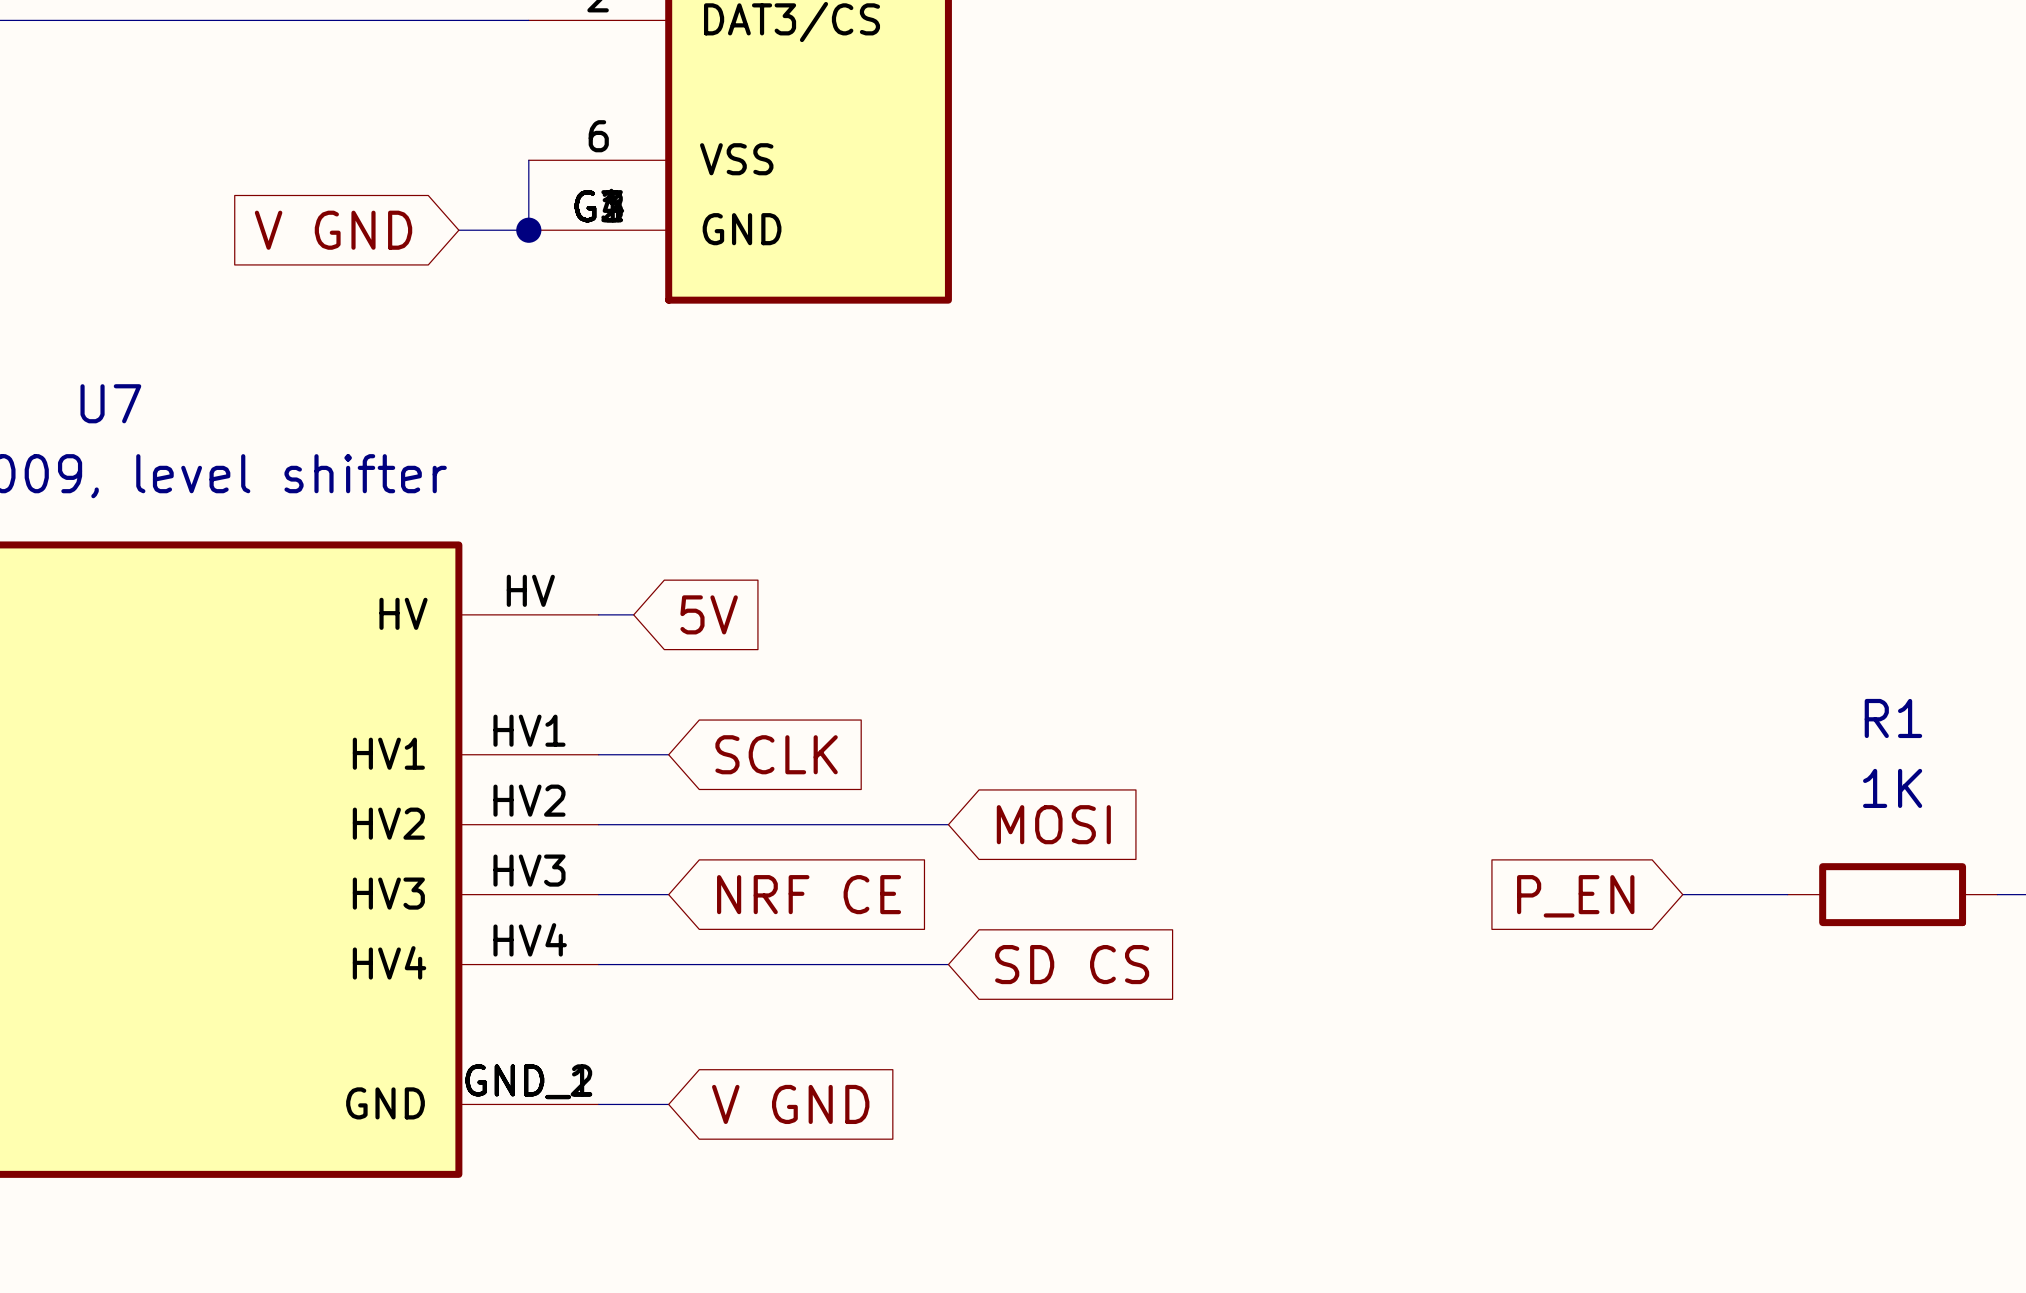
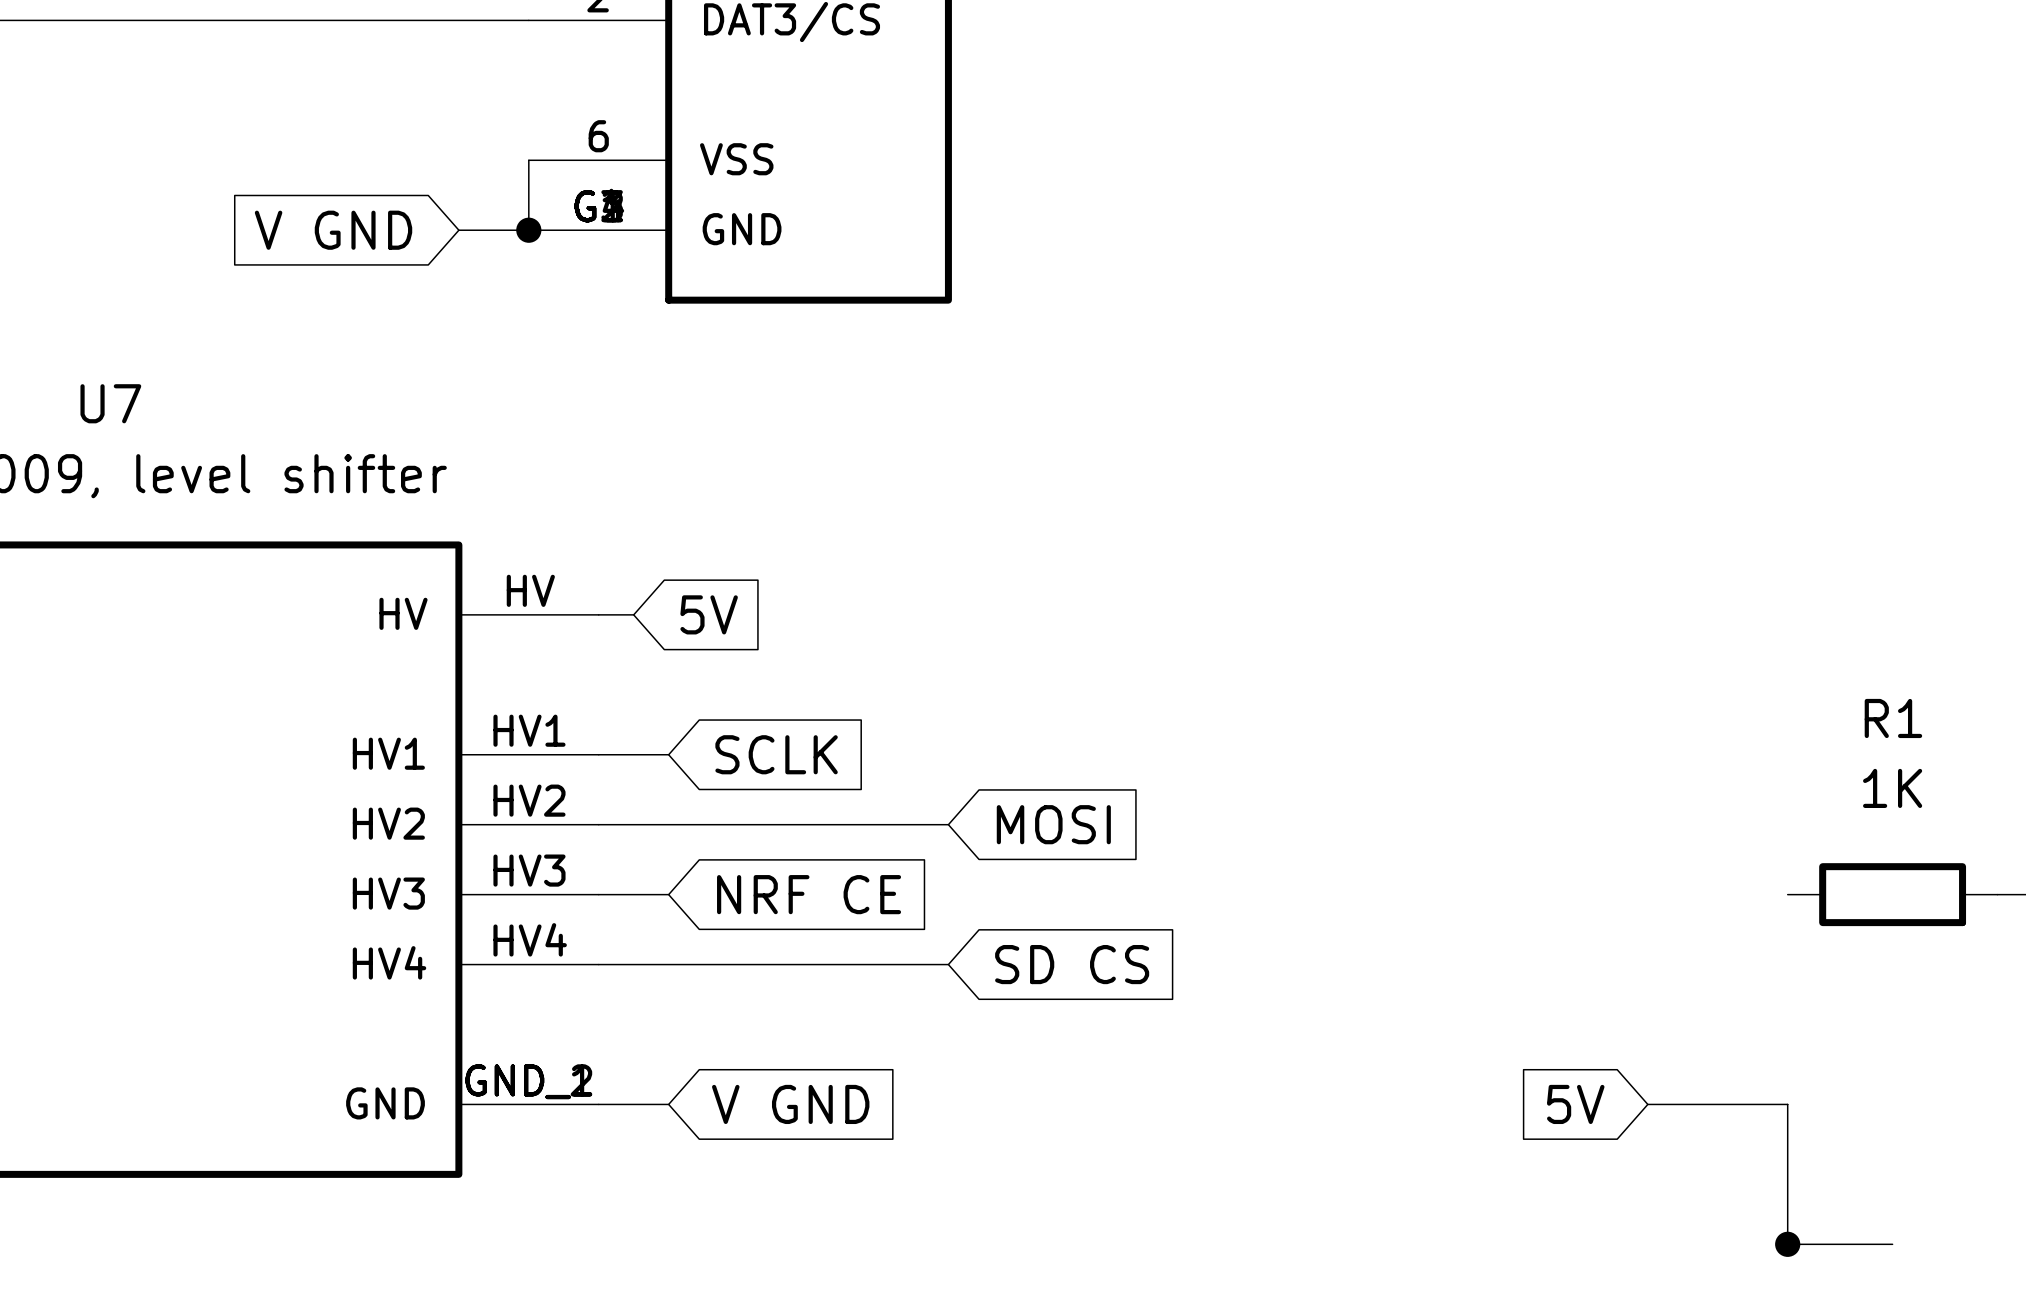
wire: (1682, 894) (1787, 894) -> none
global label: P_EN (1575, 896) -> none
global label: none -> 5V (1575, 1104)
wire: none -> (1647, 1104) (1787, 1104) (1787, 1244) (1892, 1244)
junction: none -> (1787, 1244)

